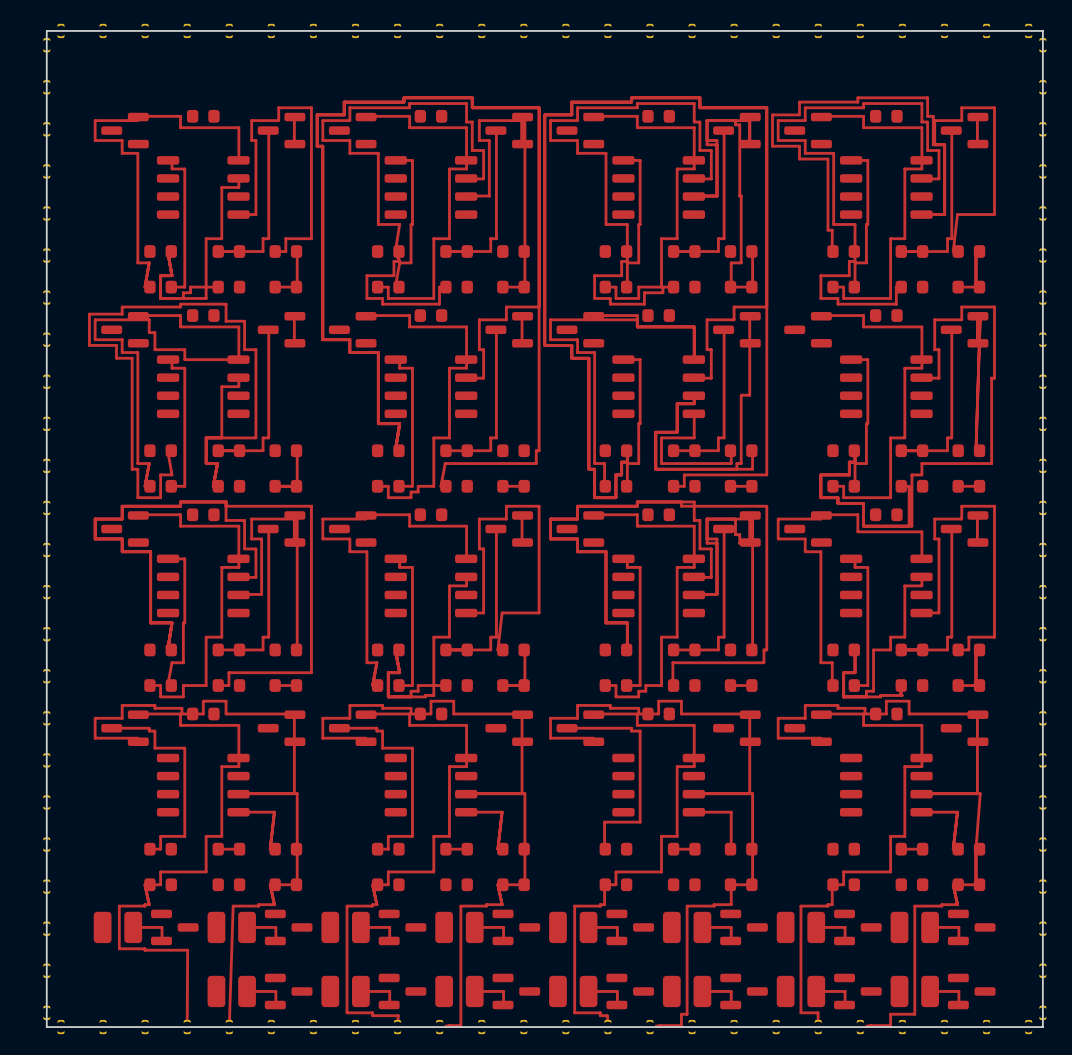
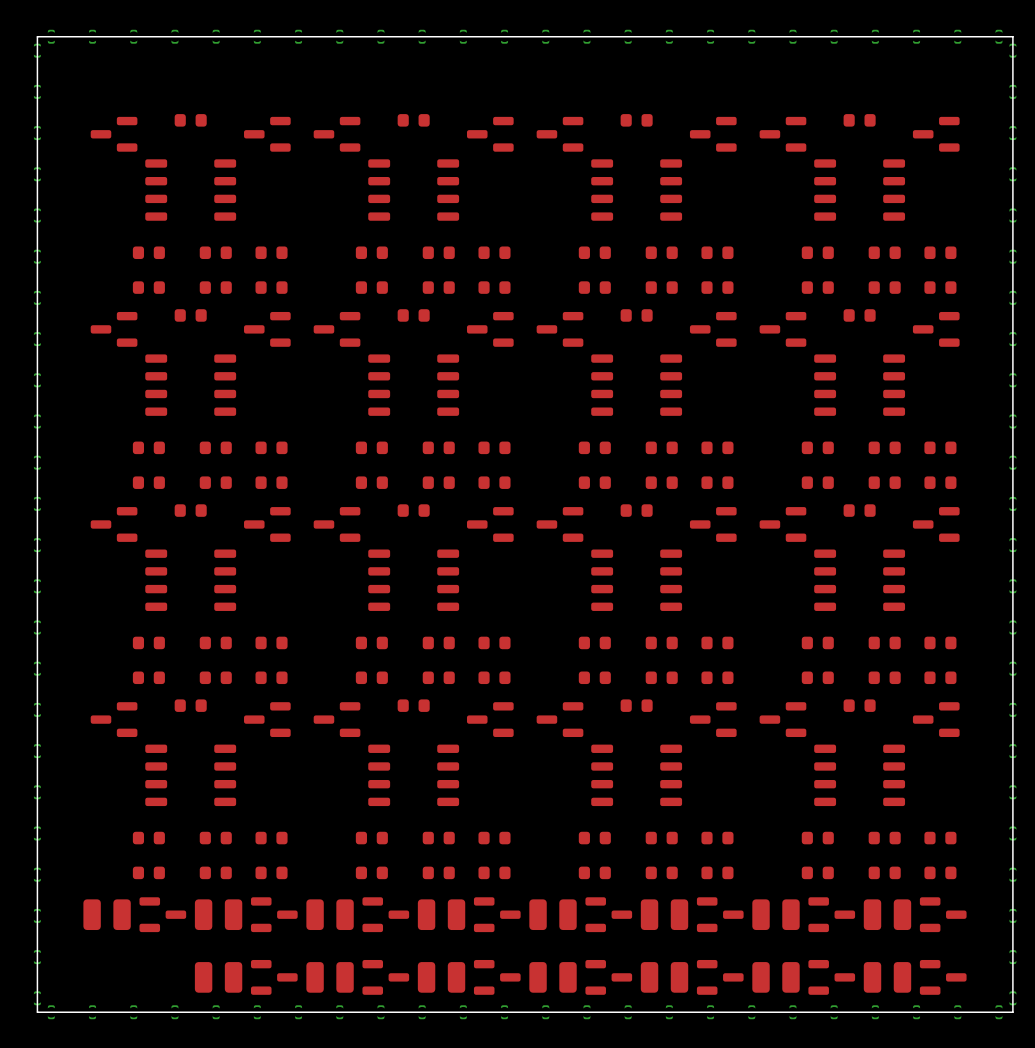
top track: (294, 116) (294, 144) -> none
top track: (365, 116) (409, 116) (409, 127) (466, 127) (466, 168) (449, 168) (449, 238) (433, 238) (433, 298) (388, 298) (388, 287) (376, 287) -> none
top track: (593, 116) (637, 116) (637, 127) (694, 127) (694, 168) (677, 168) (677, 238) (661, 238) (661, 287) (638, 287) (638, 298) (615, 298) (615, 287) (604, 287) -> none
top track: (749, 116) (749, 144) -> none
top track: (820, 116) (863, 116) (863, 127) (921, 127) (921, 168) (904, 168) (904, 238) (890, 238) (890, 298) (843, 298) (843, 287) (832, 287) -> none
top track: (977, 116) (977, 144) -> none
top track: (522, 120) (479, 120) (479, 140) (489, 140) (489, 196) (466, 196) -> none
top track: (735, 120) (735, 124) (739, 124) (741, 262) (731, 262) (731, 287) (752, 287) (752, 251) -> none
top track: (749, 120) (707, 120) (707, 144) (716, 144) -> none
top track: (268, 130) (268, 238) (263, 238) (263, 251) (217, 251) -> none
top track: (496, 130) (496, 238) (490, 238) (490, 251) (445, 251) -> none
top track: (724, 130) (724, 238) (718, 238) (718, 251) (672, 251) -> none
top track: (951, 130) (951, 238) (947, 238) (947, 251) (901, 251) -> none
top track: (707, 140) (716, 140) (716, 196) (694, 196) -> none
top track: (522, 144) (522, 116) (524, 116) (524, 287) (502, 287) -> none
top track: (934, 144) (934, 120) (961, 120) (961, 107) (994, 107) (994, 214) (957, 214) (953, 251) (957, 251) -> none
top track: (167, 160) (171, 160) (171, 168) (184, 168) (184, 287) (171, 287) -> none
top track: (238, 160) (238, 127) (180, 127) (180, 116) (137, 116) (137, 120) (95, 120) (95, 140) (122, 140) (122, 153) (137, 153) (137, 262) (149, 262) (144, 287) -> none
top track: (395, 160) (412, 160) (411, 262) (399, 262) (395, 287) (399, 287) -> none
top track: (623, 160) (640, 160) (638, 262) (627, 262) (627, 287) -> none
top track: (850, 160) (867, 160) (866, 262) (855, 262) (855, 287) -> none
top track: (238, 178) (238, 187) (221, 187) (221, 238) (206, 238) (206, 298) (160, 298) (160, 275) (171, 275) (167, 251) (171, 251) -> none
top track: (466, 178) (483, 178) (483, 150) (472, 150) (472, 122) (466, 122) (466, 103) (409, 103) (409, 107) (349, 107) (349, 120) (322, 120) (322, 140) (349, 140) (349, 153) (378, 153) (378, 224) (399, 224) (395, 251) -> none
top track: (694, 178) (711, 178) (711, 150) (699, 150) (699, 122) (694, 122) (694, 103) (637, 103) (637, 107) (577, 107) (577, 120) (550, 120) (550, 140) (577, 140) (577, 153) (606, 153) (606, 224) (627, 224) (627, 261) (621, 261) (621, 275) (594, 275) (594, 298) (610, 298) (610, 304) (644, 304) (644, 292) (662, 292) (662, 287) (672, 287) -> none
top track: (921, 178) (938, 178) (938, 150) (927, 150) (927, 122) (921, 122) (921, 103) (863, 103) (863, 107) (805, 107) (805, 120) (778, 120) (778, 140) (805, 140) (805, 153) (833, 153) (833, 224) (855, 224) (855, 261) (849, 261) (849, 275) (820, 275) (820, 298) (837, 298) (837, 304) (896, 304) (896, 287) (901, 287) -> none
top track: (238, 214) (255, 214) (255, 140) (251, 140) (251, 120) (278, 120) (278, 107) (311, 107) (311, 238) (285, 238) (285, 251) (274, 251) -> none
top track: (921, 214) (944, 214) (944, 144) (933, 144) (933, 116) (927, 116) (927, 97) (857, 97) (857, 102) (799, 102) (799, 114) (772, 114) (772, 146) (799, 146) (799, 159) (827, 159) (827, 230) (832, 230) (832, 251) -> none
top track: (297, 251) (297, 287) (274, 287) -> none
top track: (395, 251) (399, 261) (393, 261) (393, 275) (366, 275) (366, 298) (382, 298) (382, 304) (439, 304) (439, 287) (445, 287) -> none
top track: (217, 287) (190, 287) (190, 292) (183, 292) (183, 298) -> none
top track: (980, 287) (957, 287) -> none
top track: (539, 307) (506, 307) (506, 319) (479, 319) (479, 349) (483, 349) (483, 378) (466, 378) -> none
top track: (766, 307) (734, 307) (734, 319) (707, 319) (707, 349) (711, 349) (711, 378) (694, 378) -> none
top track: (137, 315) (180, 315) (180, 326) (238, 326) (238, 359) (184, 359) (184, 349) (154, 349) (154, 332) (149, 332) (149, 319) (95, 319) (95, 339) (122, 339) (122, 352) (137, 352) (137, 463) (149, 463) (144, 486) -> none
top track: (294, 315) (294, 342) -> none
top track: (365, 315) (409, 315) (409, 326) (466, 326) (466, 368) (449, 368) (449, 437) (433, 437) (433, 486) (418, 486) (418, 492) (411, 492) (411, 497) (388, 497) (388, 486) (376, 486) -> none
top track: (522, 315) (522, 342) -> none
top track: (593, 315) (637, 315) (637, 326) (694, 326) (694, 359) -> none
top track: (749, 315) (749, 395) (741, 395) (741, 463) (736, 463) (736, 469) -> none
top track: (820, 315) (863, 315) (863, 326) (921, 326) (921, 368) (904, 368) (904, 437) (890, 437) (890, 497) (843, 497) (843, 486) (832, 486) -> none
top track: (637, 319) (550, 319) (550, 339) (577, 339) (577, 352) (594, 352) (594, 463) (604, 463) (604, 486) -> none
top track: (268, 329) (268, 437) (263, 437) (263, 450) (217, 450) -> none
top track: (496, 329) (496, 437) (490, 437) (490, 450) (445, 450) -> none
top track: (724, 329) (724, 437) (718, 437) (718, 450) (672, 450) -> none
top track: (951, 329) (951, 437) (947, 437) (947, 450) (901, 450) -> none
top track: (977, 342) (977, 315) (980, 315) (975, 450) -> none
top track: (167, 359) (171, 359) (171, 368) (184, 368) (184, 486) (171, 486) -> none
top track: (395, 359) (399, 359) (399, 368) (412, 368) (412, 486) (399, 486) -> none
top track: (623, 359) (640, 359) (638, 463) (627, 463) (627, 486) -> none
top track: (850, 359) (867, 359) (866, 463) (855, 463) (855, 486) -> none
top track: (238, 378) (238, 386) (221, 386) (221, 437) -> none
top track: (921, 378) (938, 378) (938, 349) (934, 349) (934, 319) (961, 319) (961, 307) (994, 307) (994, 378) (991, 378) (991, 463) (921, 463) (921, 474) (911, 474) (911, 526) (863, 526) (863, 503) (837, 503) (837, 497) (820, 497) (820, 474) (849, 474) (849, 462) (855, 462) (855, 450) -> none
top track: (694, 395) (694, 403) (677, 403) (677, 432) (655, 432) (655, 469) (752, 469) (752, 450) -> none
top track: (694, 413) (694, 437) (661, 437) (661, 463) (731, 463) (731, 450) -> none
top track: (171, 450) (167, 450) (171, 474) (160, 474) (160, 497) (137, 497) (137, 469) (132, 469) (132, 358) (116, 358) (116, 345) (89, 345) (89, 314) (122, 314) (122, 307) (180, 307) (180, 304) (226, 304) (226, 321) (244, 321) (244, 349) (255, 349) (255, 437) (206, 437) (206, 463) (217, 463) (213, 486) (217, 486) -> none
top track: (297, 450) (297, 486) (274, 486) -> none
top track: (399, 450) (395, 450) (399, 423) (378, 423) (378, 352) (349, 352) (349, 339) (322, 339) (322, 146) (317, 146) (317, 114) (344, 114) (344, 102) (403, 102) (403, 97) (472, 97) (472, 107) (539, 107) (539, 450) (536, 450) (536, 463) (445, 463) (440, 486) (445, 486) -> none
top track: (627, 450) (627, 462) (621, 462) (621, 474) (615, 474) (615, 497) (594, 497) (594, 469) (588, 469) (588, 358) (571, 358) (571, 345) (544, 345) (544, 114) (571, 114) (571, 102) (631, 102) (631, 97) (699, 97) (699, 107) (766, 107) (766, 474) (684, 474) (684, 486) (672, 486) -> none
top track: (524, 486) (502, 486) -> none
top track: (752, 486) (731, 486) -> none
top track: (901, 486) (909, 486) (909, 526) -> none
top track: (980, 486) (957, 486) -> none
top track: (681, 501) (681, 506) (766, 506) (766, 649) (763, 649) (763, 662) (672, 662) (672, 685) -> none
top track: (226, 506) (311, 506) (311, 672) (228, 672) (228, 685) (217, 685) -> none
top track: (137, 514) (180, 514) (180, 526) (238, 526) (238, 567) (221, 567) (221, 637) (206, 637) (206, 685) (183, 685) (183, 696) (160, 696) (160, 685) (149, 685) -> none
top track: (522, 514) (522, 543) -> none
top track: (593, 514) (637, 514) (637, 526) (694, 526) (694, 567) (677, 567) (677, 637) (661, 637) (661, 685) (645, 685) (645, 691) (638, 691) (638, 696) (615, 696) (615, 685) (604, 685) -> none
top track: (749, 514) (749, 543) (739, 543) (739, 534) (735, 534) (735, 519) -> none
top track: (977, 514) (977, 543) -> none
top track: (294, 519) (251, 519) (251, 538) (261, 538) (261, 594) (238, 594) -> none
top track: (268, 529) (268, 637) (263, 637) (263, 649) (217, 649) -> none
top track: (496, 529) (496, 637) (490, 637) (490, 649) (445, 649) -> none
top track: (724, 529) (724, 637) (718, 637) (718, 649) (672, 649) -> none
top track: (951, 529) (951, 637) (947, 637) (947, 649) (901, 649) -> none
top track: (707, 538) (716, 538) (716, 594) (694, 594) -> none
top track: (294, 543) (294, 514) (297, 514) (297, 649) -> none
top track: (716, 543) (707, 543) (707, 519) (752, 519) (752, 649) -> none
top track: (167, 558) (184, 558) (183, 662) (171, 662) (167, 685) (171, 685) -> none
top track: (395, 558) (399, 558) (399, 567) (412, 567) (412, 685) (399, 685) -> none
top track: (466, 558) (466, 526) (409, 526) (409, 514) (365, 514) (365, 519) (322, 519) (322, 538) (349, 538) (349, 551) (366, 551) (366, 662) (376, 662) (372, 685) -> none
top track: (623, 558) (627, 558) (627, 567) (640, 567) (640, 685) (627, 685) -> none
top track: (850, 558) (855, 558) (855, 567) (867, 567) (867, 685) (855, 685) -> none
top track: (921, 558) (921, 531) (857, 531) (857, 514) (820, 514) (820, 519) (778, 519) (778, 538) (805, 538) (805, 551) (820, 551) (820, 662) (832, 662) (832, 685) -> none
top track: (238, 577) (255, 577) (255, 548) (244, 548) (244, 520) (226, 520) (226, 501) (180, 501) (180, 506) (122, 506) (122, 519) (95, 519) (95, 538) (122, 538) (122, 551) (150, 551) (150, 622) (171, 622) (167, 649) (171, 649) -> none
top track: (466, 577) (466, 585) (449, 585) (449, 637) (433, 637) (433, 695) (388, 696) (388, 672) (399, 672) (395, 649) (399, 649) -> none
top track: (694, 577) (711, 577) (711, 548) (699, 548) (699, 520) (694, 520) (694, 501) (637, 501) (637, 506) (577, 506) (577, 519) (550, 519) (550, 538) (577, 538) (577, 551) (606, 551) (606, 622) (627, 622) (627, 649) -> none
top track: (921, 577) (921, 585) (904, 585) (904, 637) (890, 637) (890, 649) (873, 649) (873, 691) (866, 691) (866, 696) -> none
top track: (466, 612) (483, 612) (483, 548) (479, 548) (479, 519) (506, 519) (506, 506) (539, 506) (539, 612) (502, 612) (497, 649) (502, 649) -> none
top track: (921, 612) (938, 612) (938, 538) (934, 538) (934, 519) (961, 519) (961, 506) (994, 506) (994, 637) (968, 637) (968, 649) (957, 649) -> none
top track: (524, 649) (524, 685) (502, 685) -> none
top track: (855, 649) (855, 672) (843, 672) (843, 696) (901, 695) (897, 685) -> none
top track: (297, 685) (274, 685) -> none
top track: (445, 685) (418, 685) (418, 691) (411, 691) (411, 696) -> none
top track: (752, 685) (731, 685) -> none
top track: (980, 685) (957, 685) -> none
top track: (137, 713) (180, 713) (180, 725) (238, 725) (238, 766) (221, 766) (221, 836) (206, 836) (206, 871) (160, 871) (160, 884) (149, 884) -> none
top track: (365, 713) (409, 713) (409, 725) (466, 725) (466, 766) (449, 766) (449, 836) (433, 836) (433, 871) (388, 871) (388, 884) (376, 884) -> none
top track: (593, 713) (637, 713) (637, 725) (694, 725) (694, 766) (677, 766) (677, 836) (661, 836) (661, 871) (615, 871) (615, 884) (604, 884) (604, 904) (574, 906) (574, 1012) (600, 1012) (600, 1015) (607, 1015) (607, 1027) -> none
top track: (820, 713) (863, 713) (863, 725) (921, 725) (921, 766) (904, 766) (904, 836) (890, 836) (890, 871) (843, 871) (843, 884) (832, 884) (832, 904) (800, 906) (800, 1012) (818, 1012) (818, 1027) -> none
top track: (112, 728) (149, 728) (149, 731) (154, 731) (154, 748) (184, 748) (184, 836) (160, 836) (160, 849) (149, 849) -> none
top track: (339, 728) (376, 728) (376, 731) (382, 731) (382, 748) (412, 748) (412, 836) (388, 836) (388, 849) (376, 849) -> none
top track: (567, 728) (631, 728) (631, 731) (640, 731) (640, 822) (604, 822) (604, 849) -> none
top track: (137, 742) (137, 738) (95, 738) (95, 718) (122, 718) (122, 705) (154, 705) (154, 708) (181, 708) (181, 713) (203, 713) (203, 701) (226, 701) (226, 713) (294, 713) (294, 793) -> none
top track: (365, 742) (365, 738) (322, 738) (322, 718) (349, 718) (349, 705) (382, 705) (382, 708) (411, 708) (411, 713) (430, 713) (430, 701) (453, 701) (453, 713) (522, 713) (522, 793) -> none
top track: (593, 742) (593, 738) (550, 738) (550, 718) (577, 718) (577, 705) (610, 705) (610, 708) (638, 708) (638, 713) (658, 713) (658, 701) (681, 701) (681, 713) (749, 713) (749, 793) -> none
top track: (820, 742) (820, 738) (778, 738) (778, 718) (805, 718) (805, 705) (837, 705) (837, 708) (864, 708) (864, 713) (886, 713) (886, 701) (909, 701) (909, 713) (977, 713) (977, 793) -> none
top track: (238, 793) (297, 793) (297, 884) (274, 884) -> none
top track: (466, 793) (524, 793) (524, 884) (502, 884) -> none
top track: (694, 793) (752, 793) (752, 884) (731, 884) (731, 904) (687, 906) (687, 1014) (681, 1014) (681, 1025) (649, 1027) -> none
top track: (921, 793) (980, 793) (975, 849) -> none
top track: (238, 812) (274, 812) (270, 849) -> none
top track: (466, 812) (502, 812) (497, 849) -> none
top track: (694, 812) (731, 812) (731, 849) -> none
top track: (921, 812) (957, 812) (953, 849) -> none
top track: (240, 849) (217, 849) -> none
top track: (467, 849) (445, 849) -> none
top track: (695, 849) (672, 849) -> none
top track: (923, 849) (901, 849) -> none
top track: (144, 884) (149, 904) (119, 906) (119, 948) (187, 950) (187, 1027) -> none
top track: (270, 884) (274, 904) (233, 906) (229, 1027) -> none
top track: (372, 884) (376, 904) (347, 906) (347, 1012) (398, 1015) (397, 1027) -> none
top track: (497, 884) (502, 904) (460, 906) (460, 1025) (439, 1027) -> none
top track: (953, 884) (957, 904) (914, 906) (914, 1014) (890, 1014) (890, 1025) (860, 1027) -> none
top track: (980, 884) (957, 884) -> none
top track: (133, 927) (162, 927) (162, 941) -> none
top track: (247, 927) (275, 927) (275, 941) -> none
top track: (361, 927) (389, 927) (389, 941) -> none
top track: (475, 927) (503, 927) (503, 941) -> none
top track: (588, 927) (617, 927) (617, 941) -> none
top track: (702, 927) (731, 927) (731, 941) -> none
top track: (816, 927) (845, 927) (845, 941) -> none
top track: (930, 927) (958, 927) (958, 941) -> none
top track: (247, 991) (275, 991) (275, 1004) -> none
top track: (361, 991) (389, 991) (389, 1004) -> none
top track: (475, 991) (503, 991) (503, 1004) -> none
top track: (588, 991) (617, 991) (617, 1004) -> none
top track: (702, 991) (731, 991) (731, 1004) -> none
top track: (816, 991) (845, 991) (845, 1004) -> none
top track: (930, 991) (958, 991) (958, 1004) -> none

